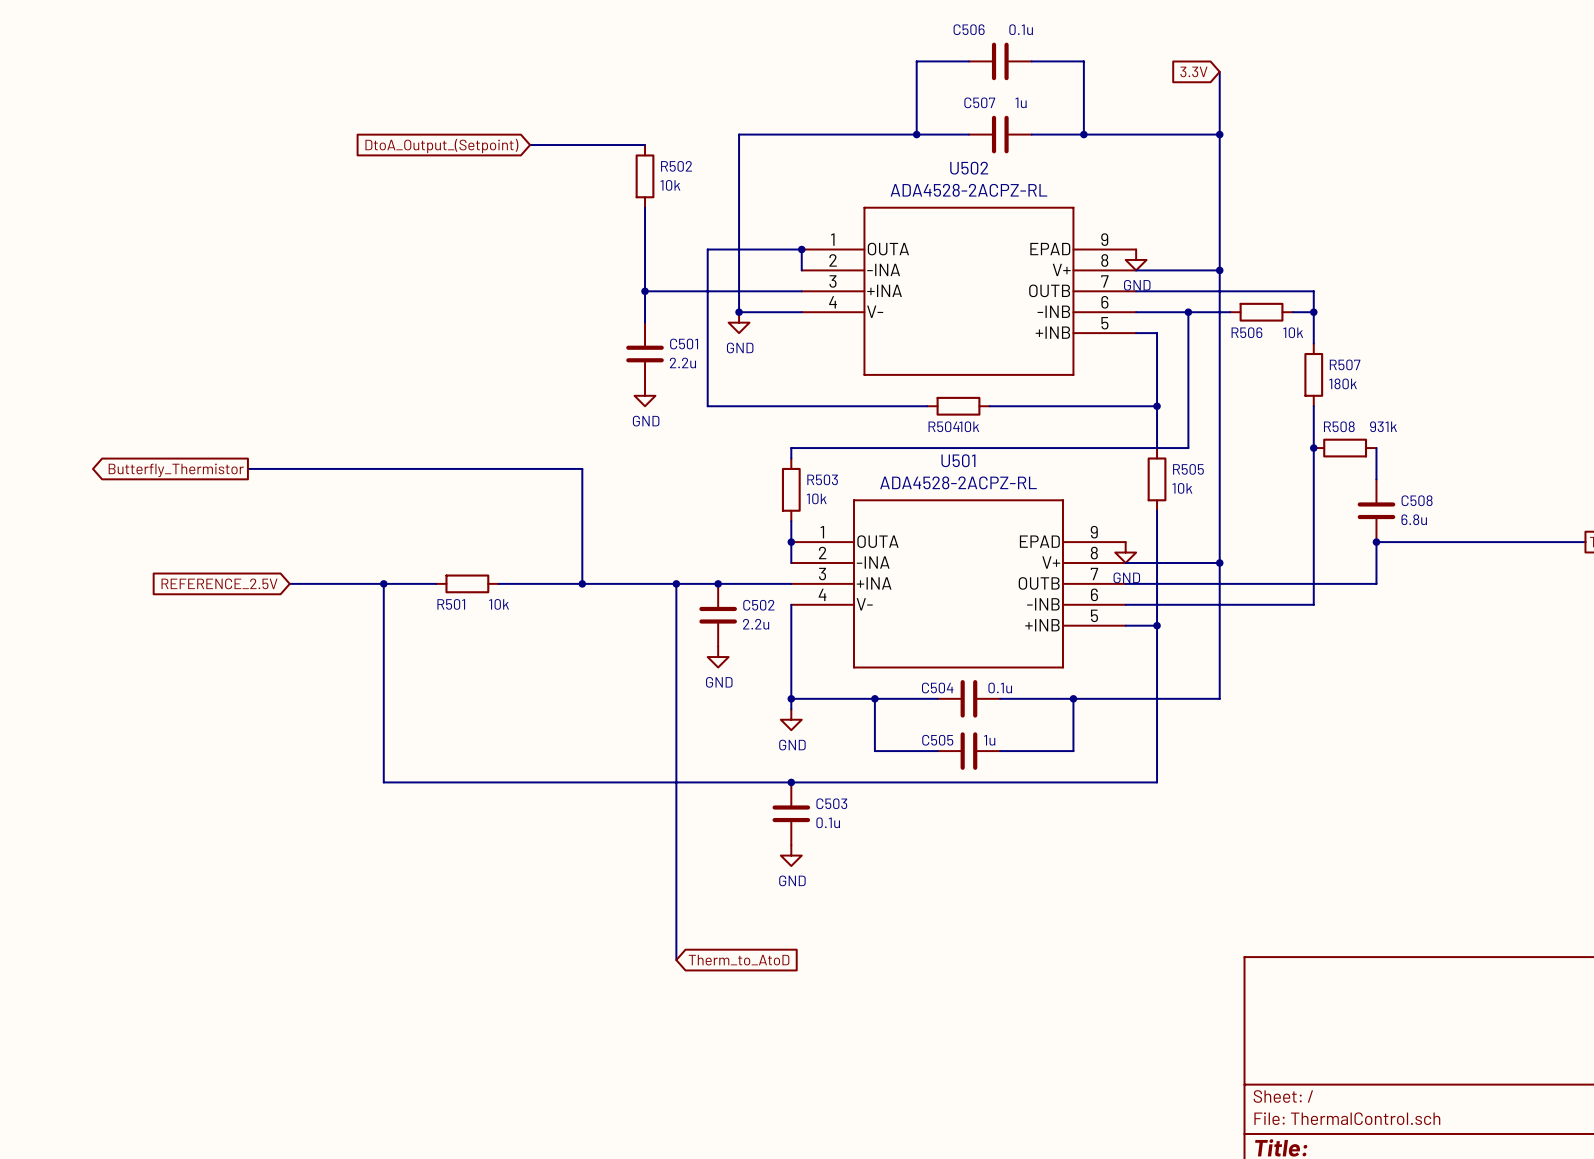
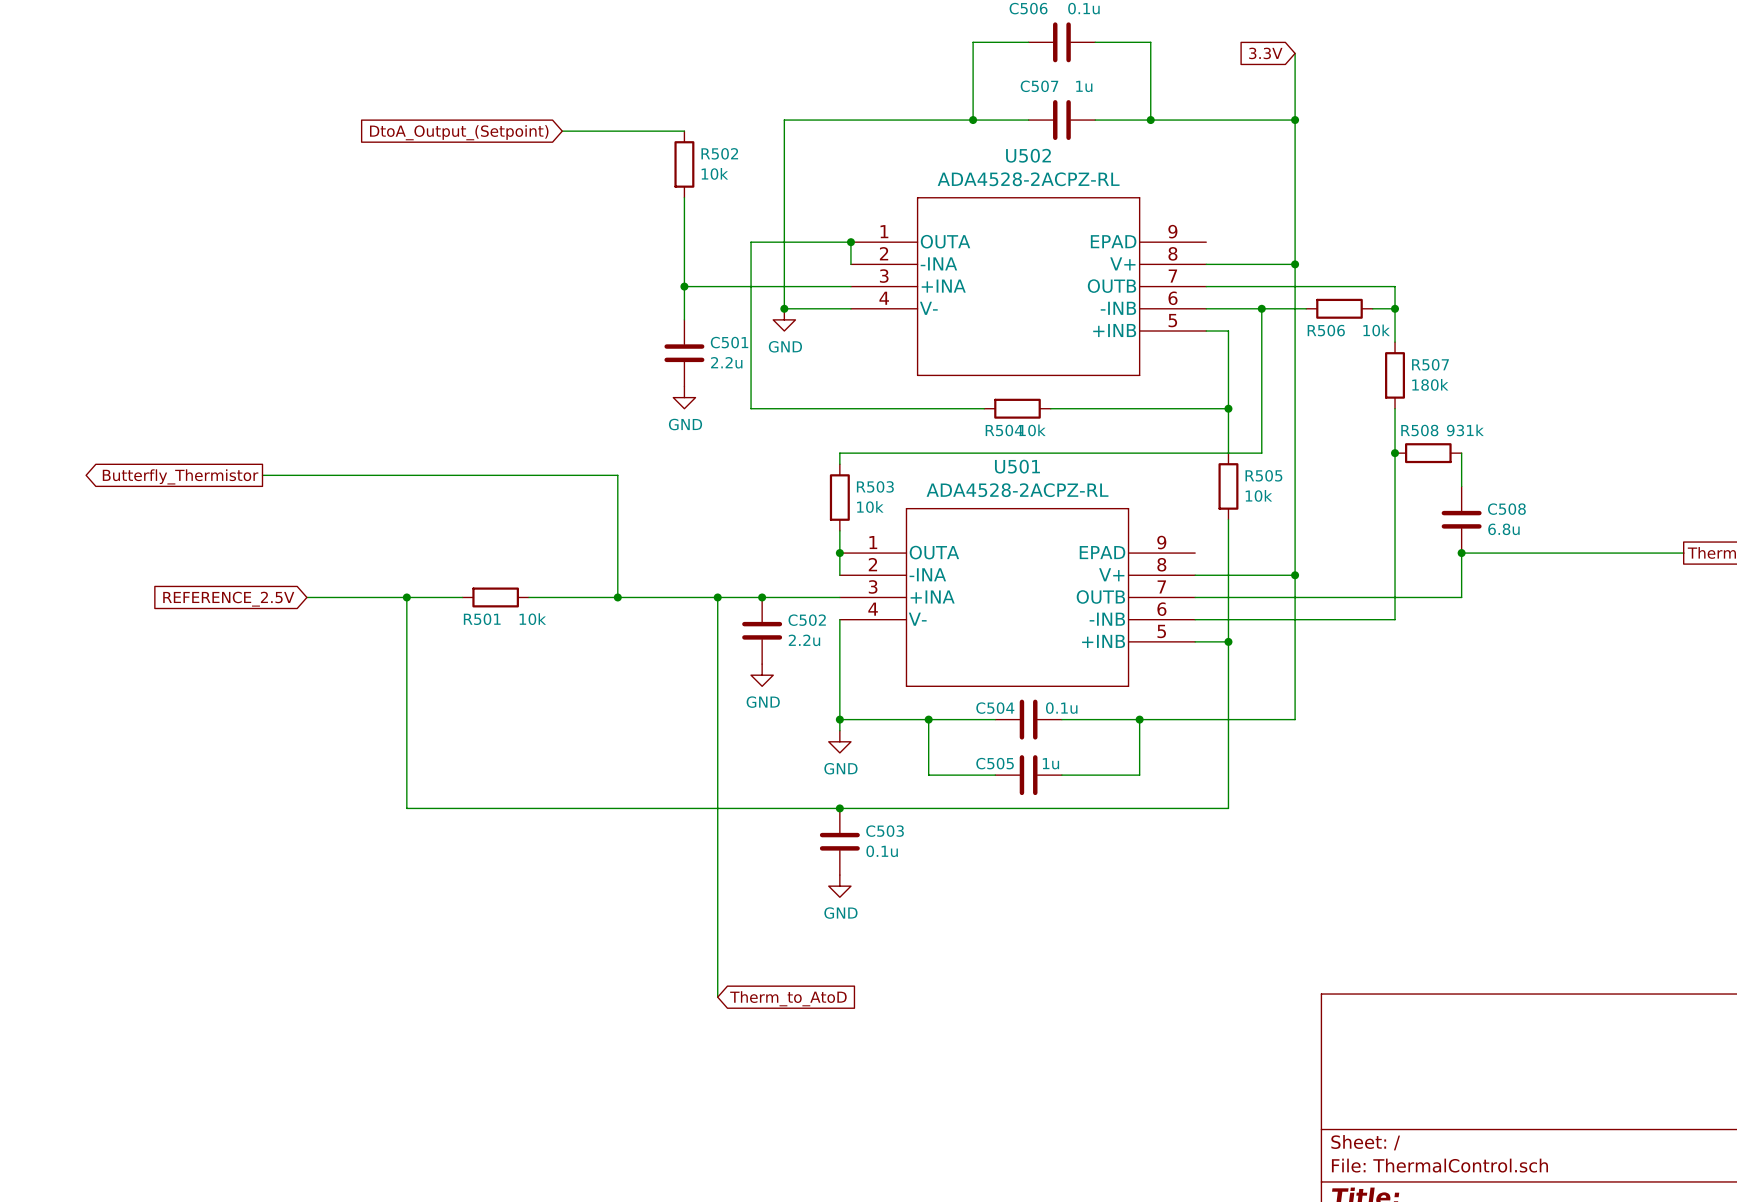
power symbol: GND (1136, 259) -> none
power symbol: GND (1125, 552) -> none

